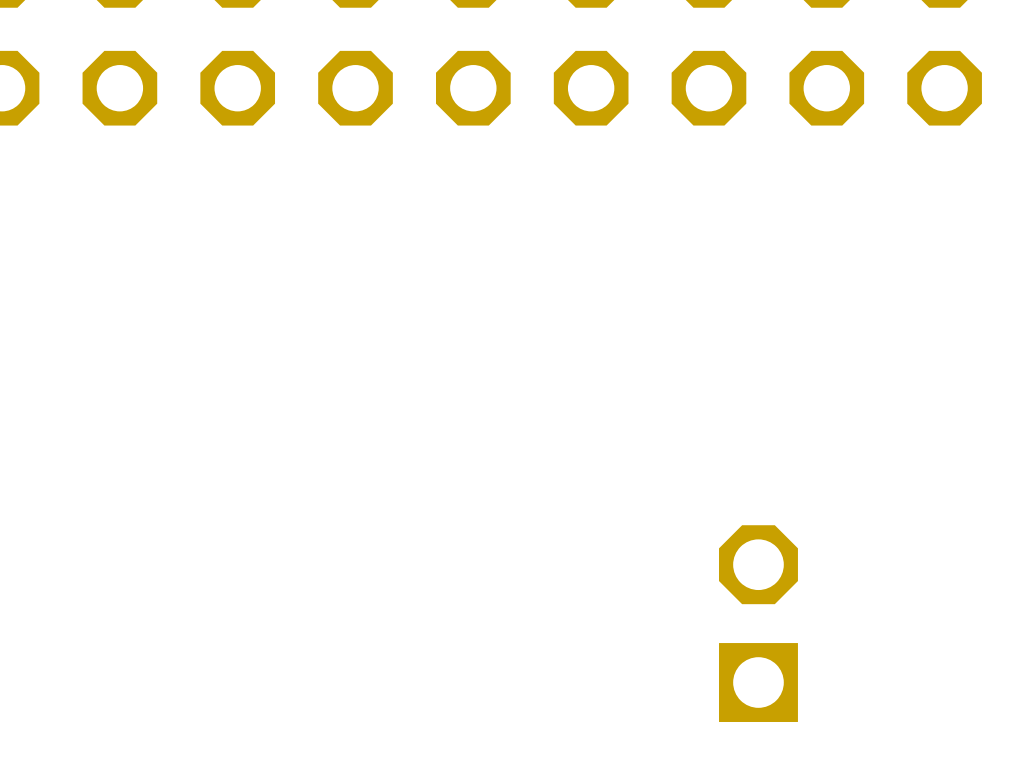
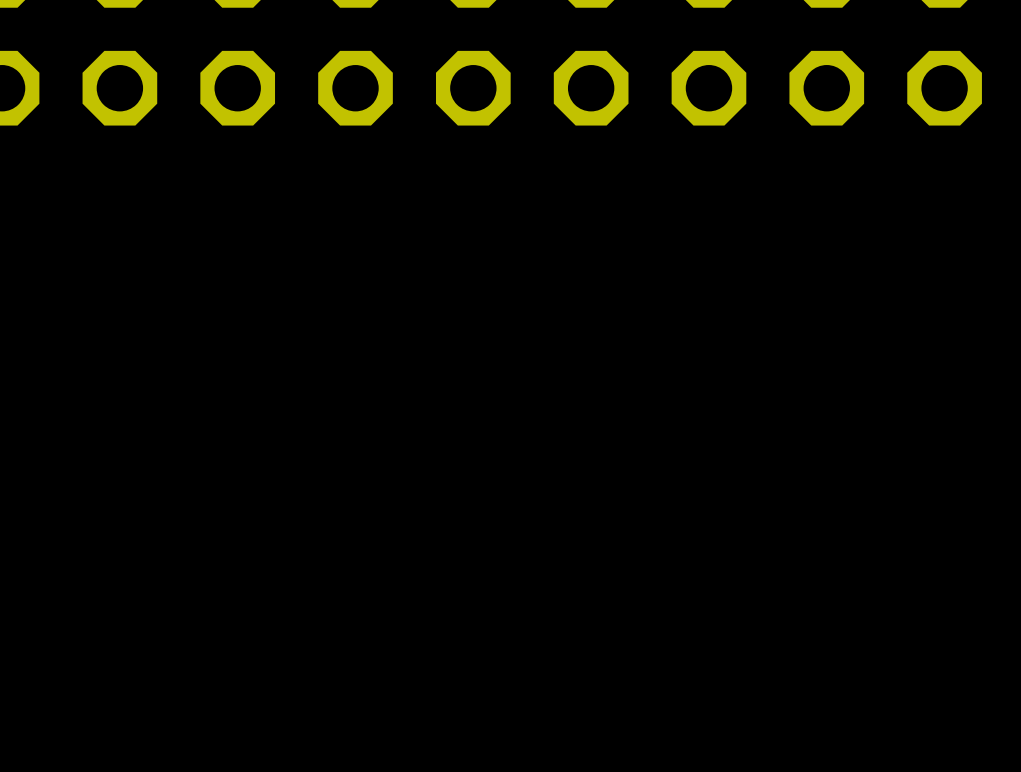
part: (758, 623) -> none

